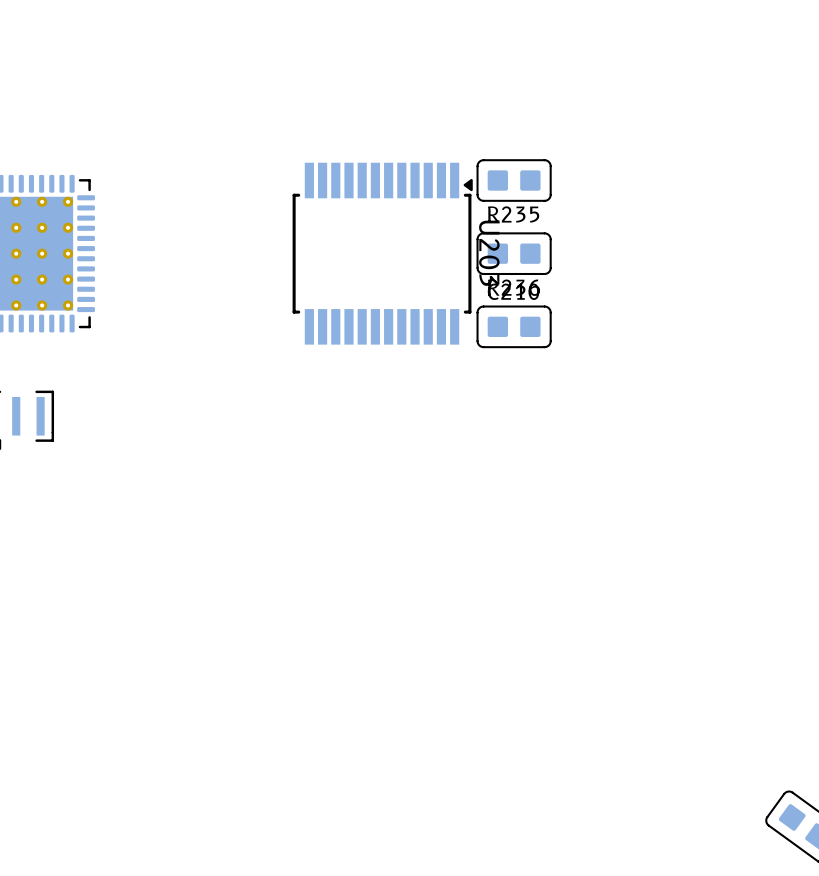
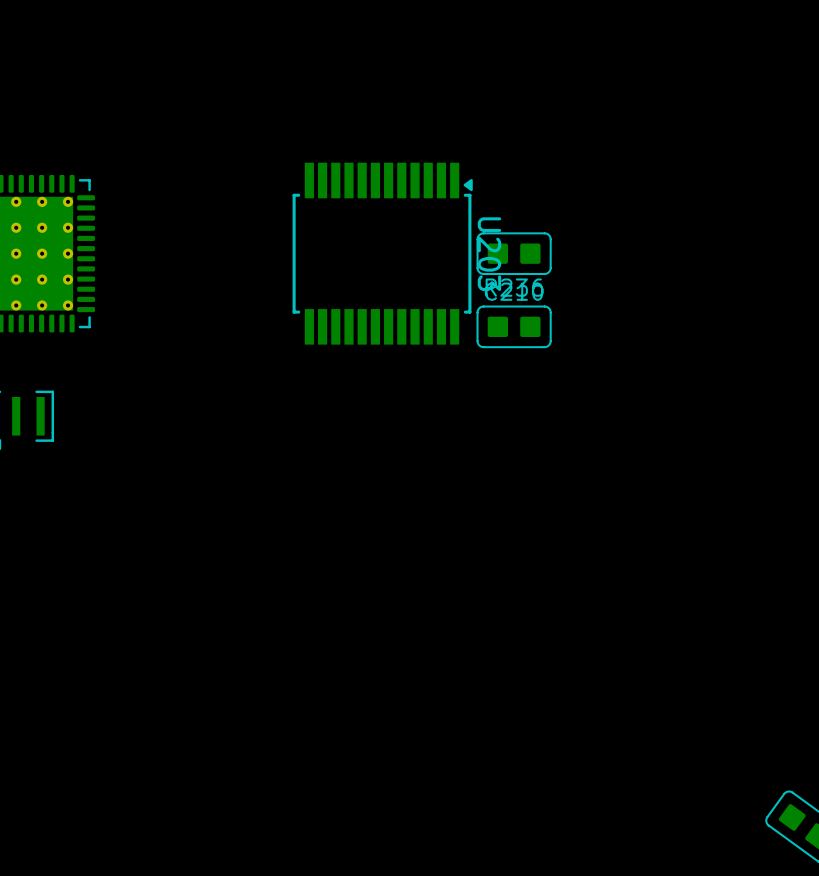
R235: (514, 180) -> none

